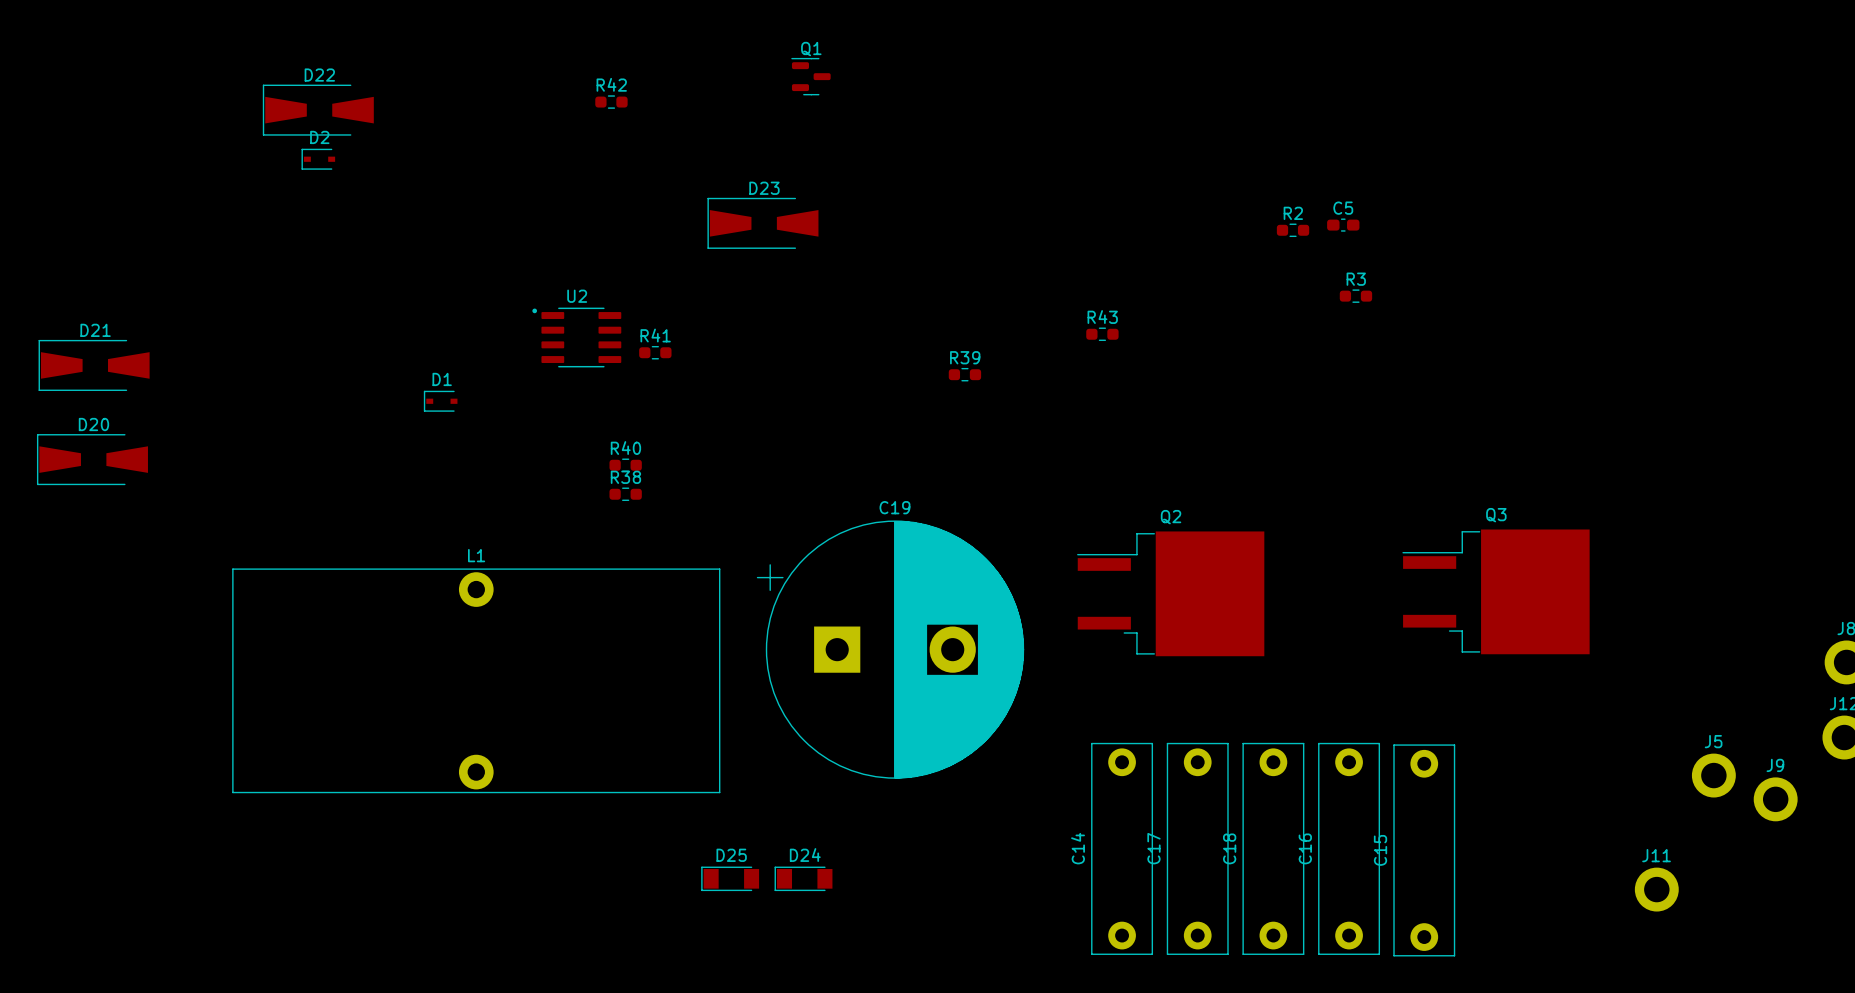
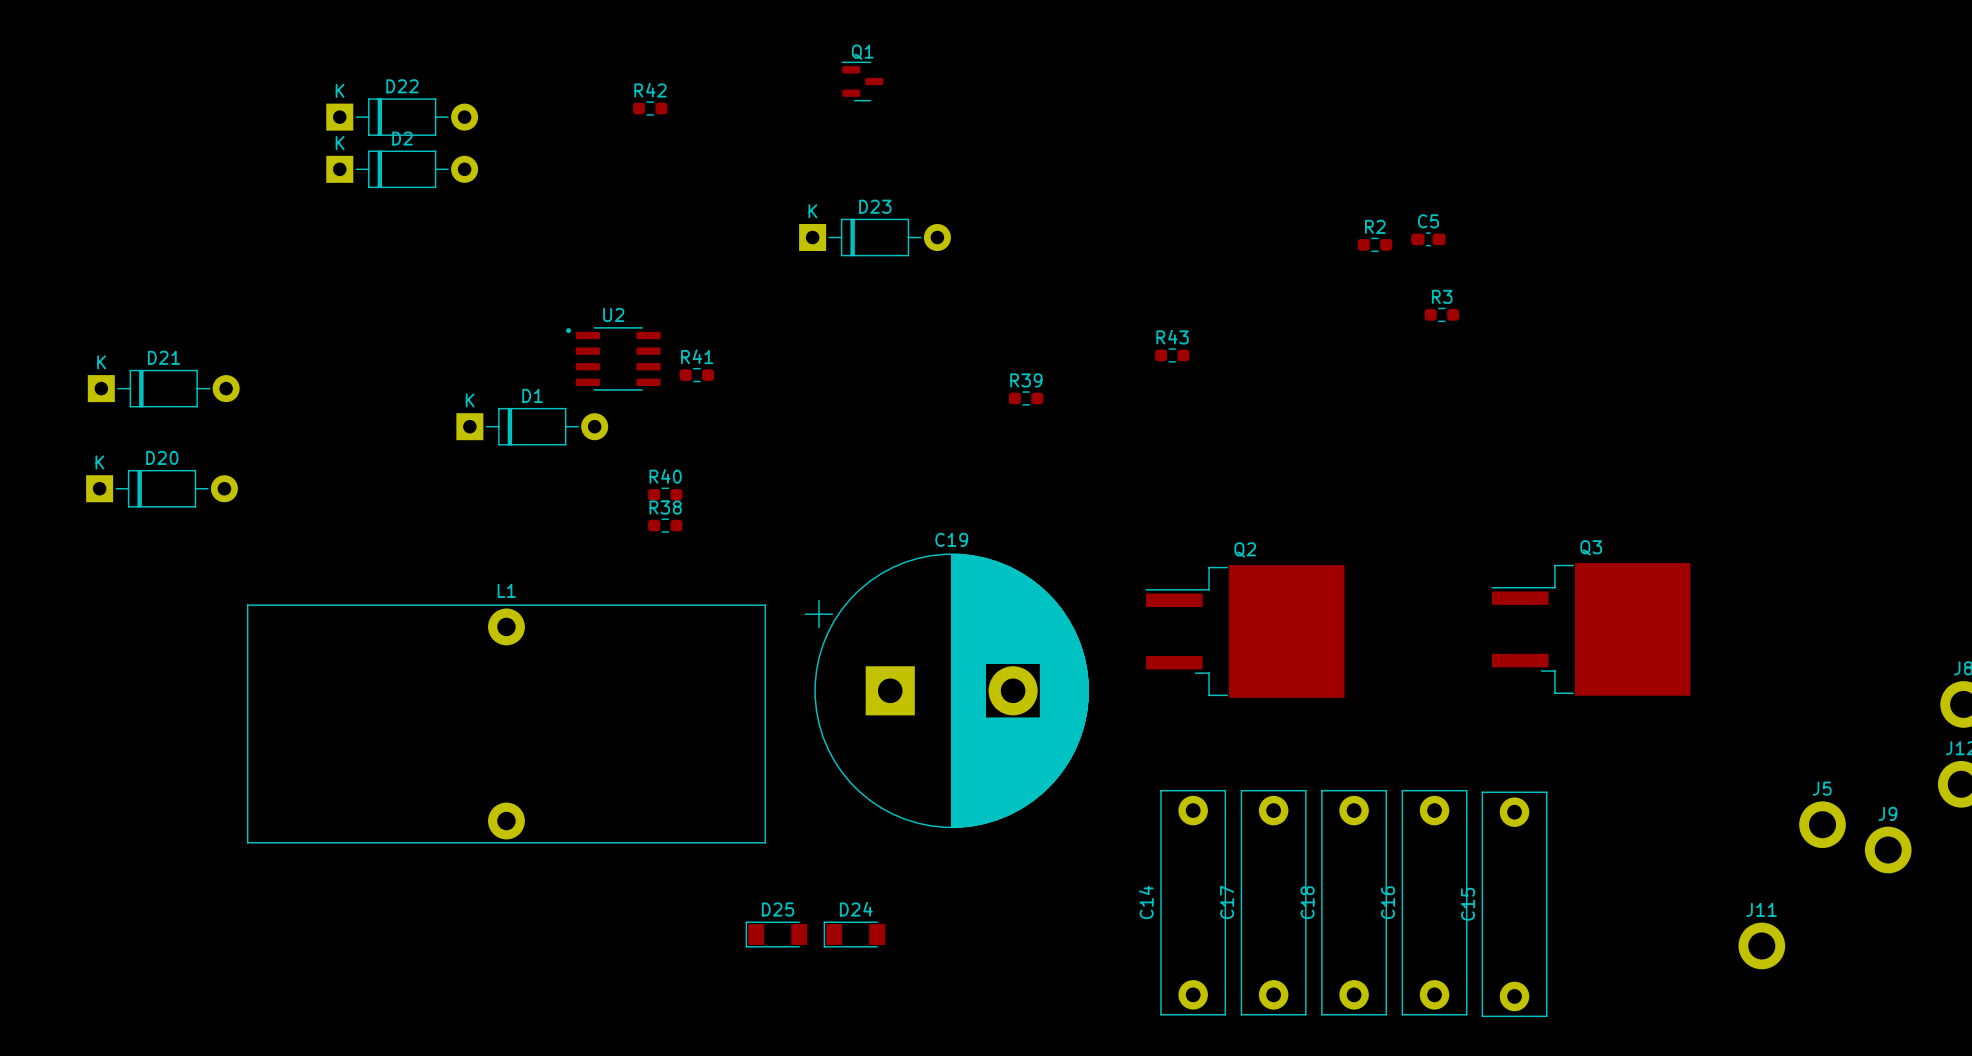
D22 footprint: [262, 84, 374, 136] -> [326, 98, 479, 136]
D2 footprint: [301, 148, 336, 170] -> [326, 150, 479, 189]
D23 footprint: [707, 197, 819, 249] -> [799, 218, 951, 257]
D21 footprint: [38, 339, 150, 391] -> [87, 369, 240, 408]
D1 footprint: [423, 390, 458, 412] -> [456, 407, 609, 446]
D20 footprint: [36, 434, 148, 486] -> [86, 469, 238, 508]

